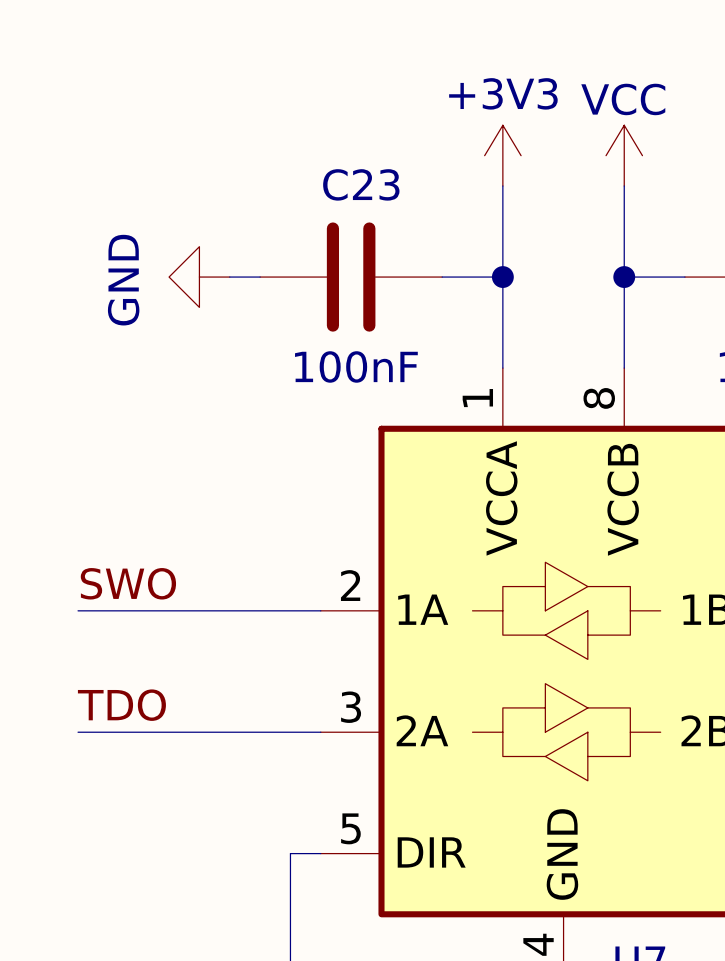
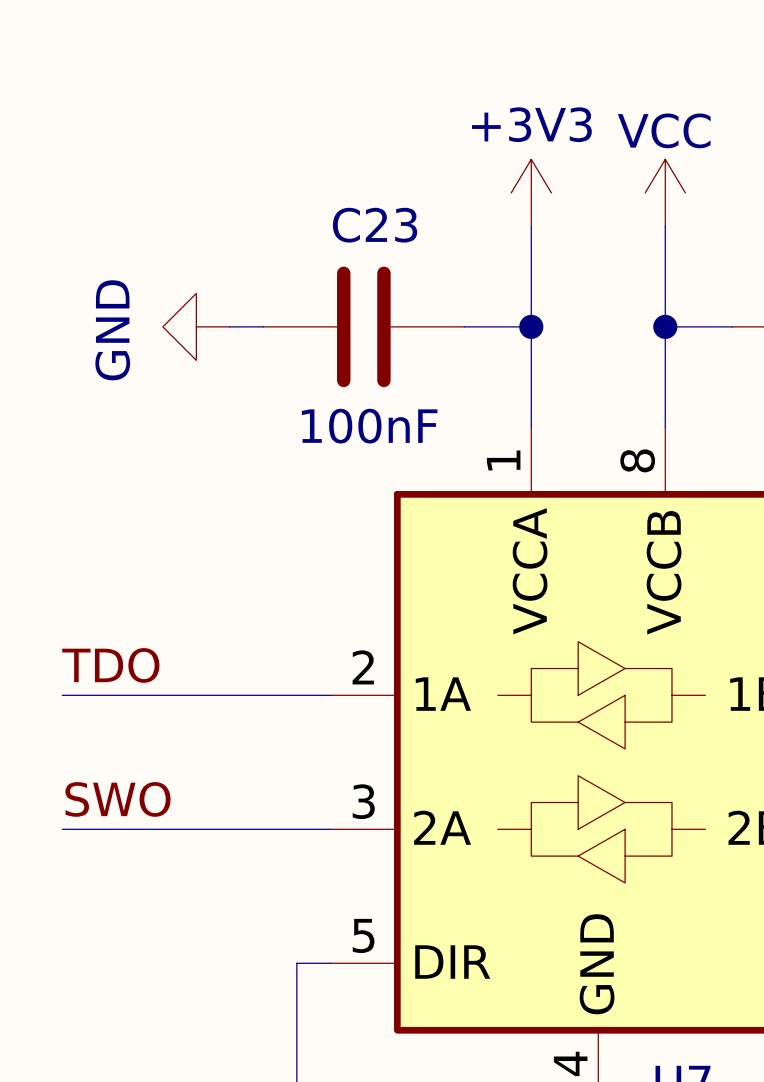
label: SWO (128, 583) -> TDO (110, 665)
label: TDO (121, 705) -> SWO (117, 799)

